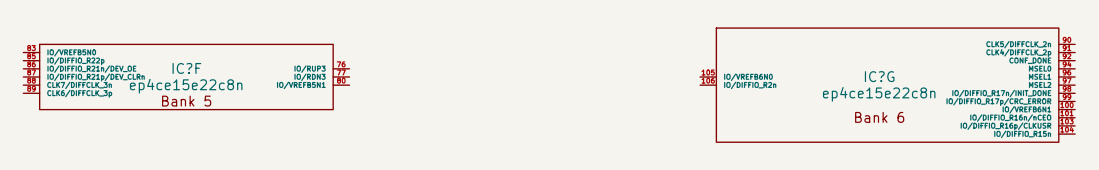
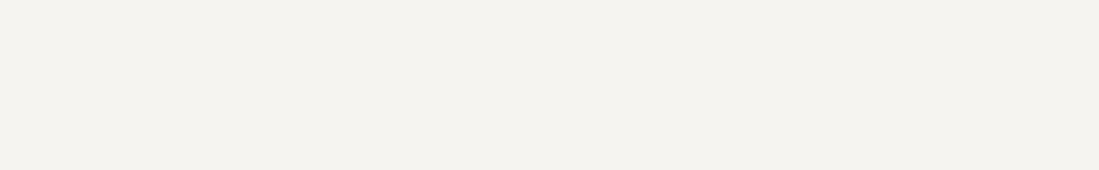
IC?F: ep4ce15e22c8n (186, 76) -> none
IC?G: ep4ce15e22c8n (887, 85) -> none

